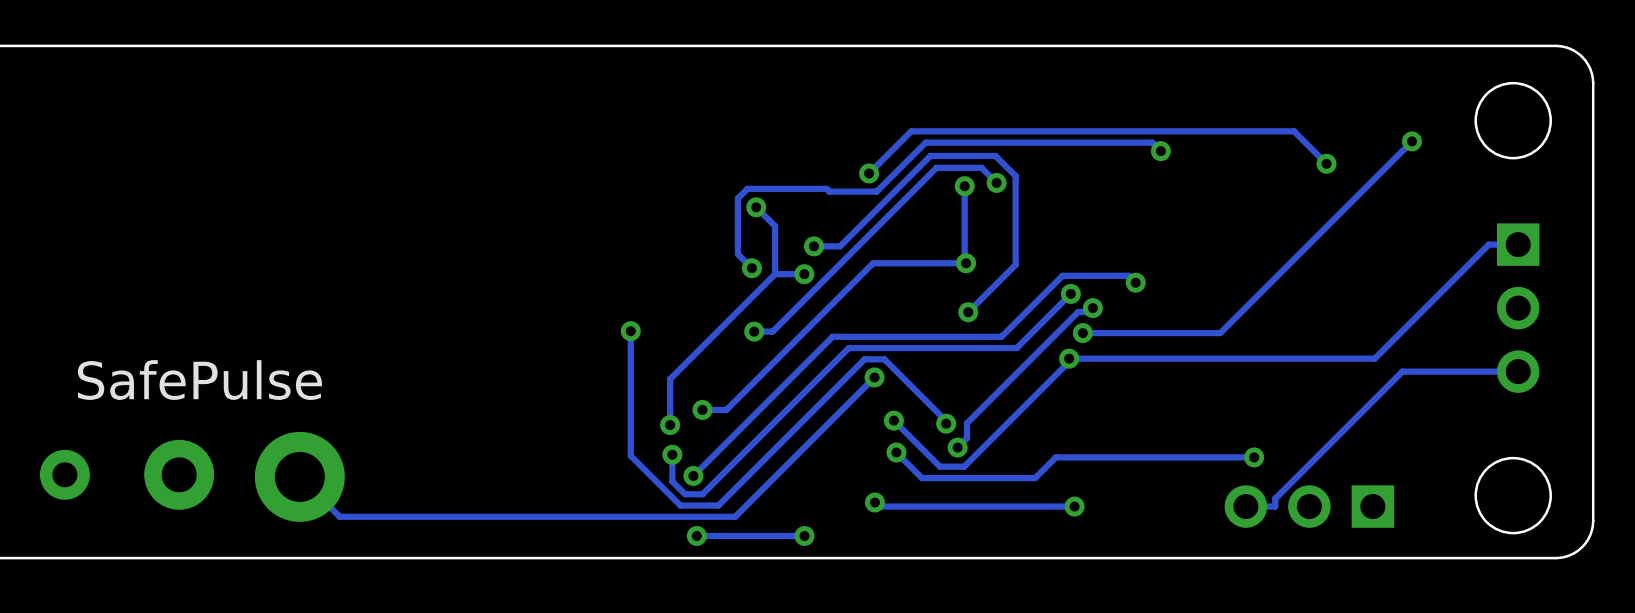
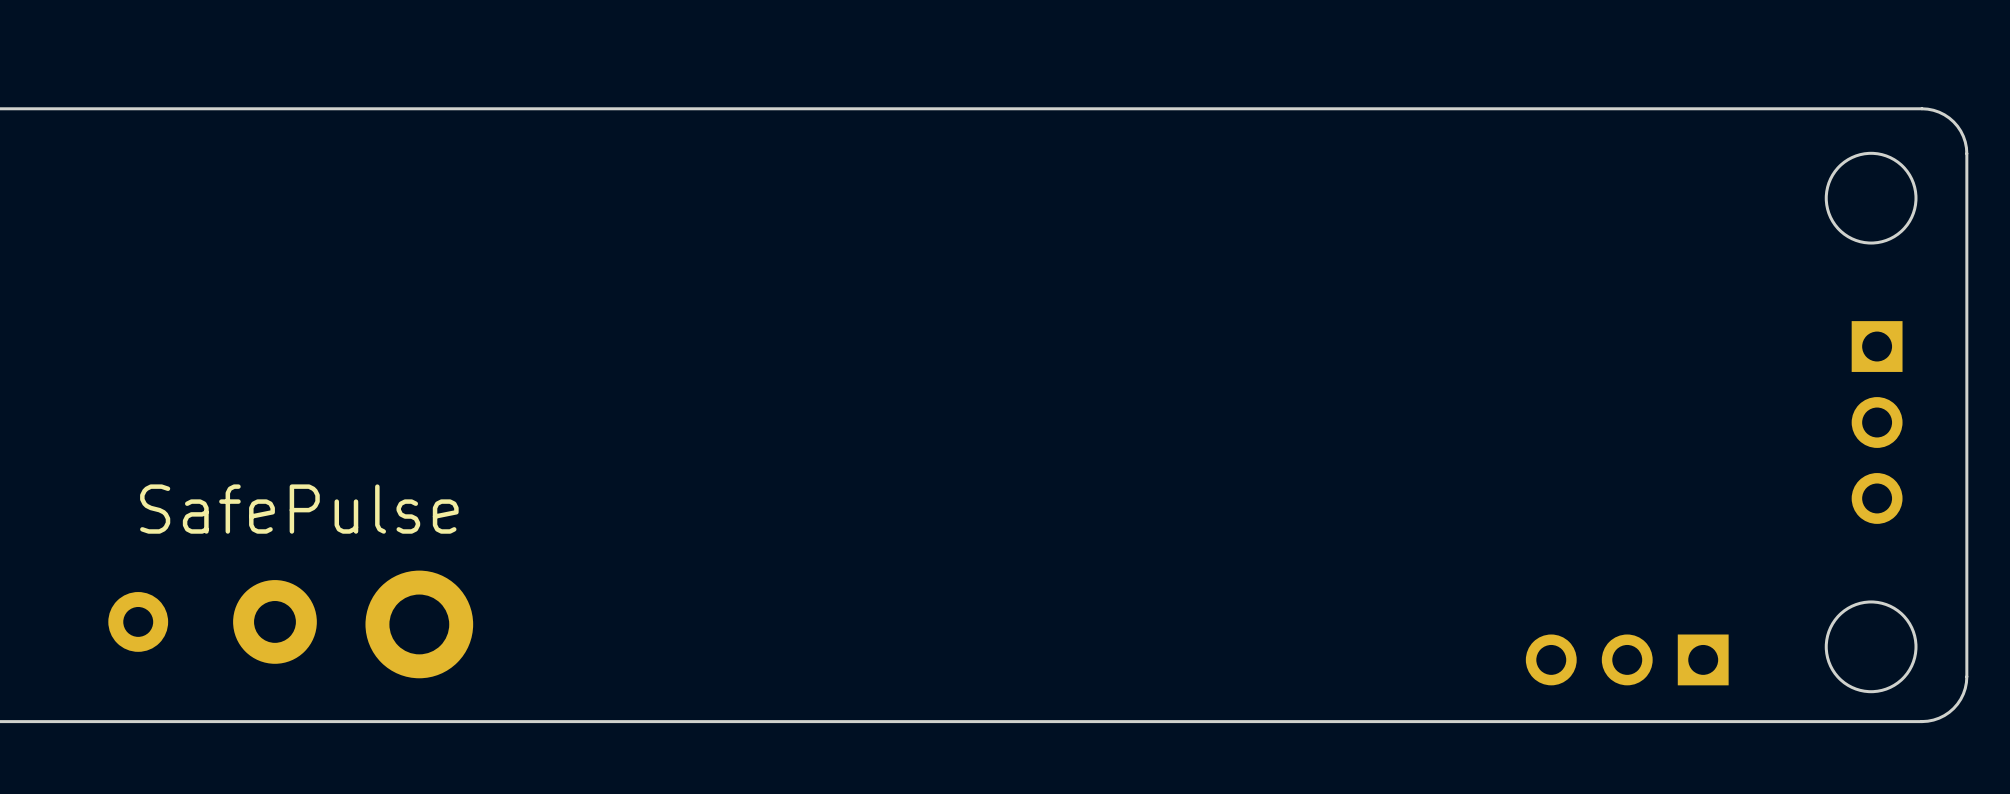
track: (1411, 141) (1220, 333) (1082, 333) -> none
via: (1411, 141) -> none
track: (1160, 151) (1152, 142) (925, 142) (876, 191) (829, 191) (826, 188) (747, 188) (737, 198) (737, 254) (751, 268) -> none
via: (1160, 151) -> none
track: (1326, 163) (1294, 131) (911, 131) (869, 173) -> none
via: (1326, 163) -> none
via: (869, 173) -> none
track: (996, 182) (981, 167) (936, 167) (772, 331) (754, 331) -> none
via: (996, 182) -> none
track: (964, 186) (964, 263) -> none
via: (964, 186) -> none
track: (756, 207) (775, 226) (775, 274) -> none
via: (756, 207) -> none
track: (1518, 244) (1488, 244) (1374, 358) (1069, 358) (1069, 361) (964, 466) (939, 466) (893, 420) -> none
track: (814, 246) (840, 246) (930, 155) (995, 155) (1015, 176) (1015, 264) (968, 312) -> none
via: (814, 246) -> none
track: (966, 263) (873, 263) (726, 409) (702, 409) -> none
via: (966, 263) -> none
via: (751, 268) -> none
track: (775, 274) (670, 379) (670, 425) -> none
track: (804, 274) (775, 274) -> none
via: (804, 274) -> none
track: (1135, 282) (1128, 275) (1062, 275) (1001, 336) (832, 336) (693, 475) -> none
via: (1135, 282) -> none
track: (1070, 293) (1016, 348) (848, 348) (702, 494) (685, 494) (672, 481) (672, 454) -> none
via: (1070, 293) -> none
track: (1092, 308) (1088, 312) (1078, 312) (967, 423) (967, 438) (957, 447) -> none
via: (1092, 308) -> none
via: (968, 312) -> none
track: (630, 331) (630, 455) (680, 505) (718, 505) (864, 359) (884, 359) (946, 421) (946, 423) -> none
via: (630, 331) -> none
via: (754, 331) -> none
via: (1082, 333) -> none
via: (1069, 358) -> none
track: (1518, 371) (1402, 371) (1275, 498) (1275, 506) (1245, 506) -> none
track: (874, 377) (735, 516) (339, 516) (299, 476) -> none
via: (874, 377) -> none
via: (702, 409) -> none
via: (893, 420) -> none
via: (946, 423) -> none
via: (670, 425) -> none
via: (957, 447) -> none
track: (896, 452) (921, 478) (1035, 478) (1055, 457) (1254, 457) -> none
via: (896, 452) -> none
via: (672, 454) -> none
via: (1254, 457) -> none
via: (693, 475) -> none
track: (874, 502) (878, 506) (1074, 506) -> none
via: (874, 502) -> none
via: (1074, 506) -> none
via: (696, 535) -> none
track: (804, 535) (696, 535) -> none
via: (804, 535) -> none

